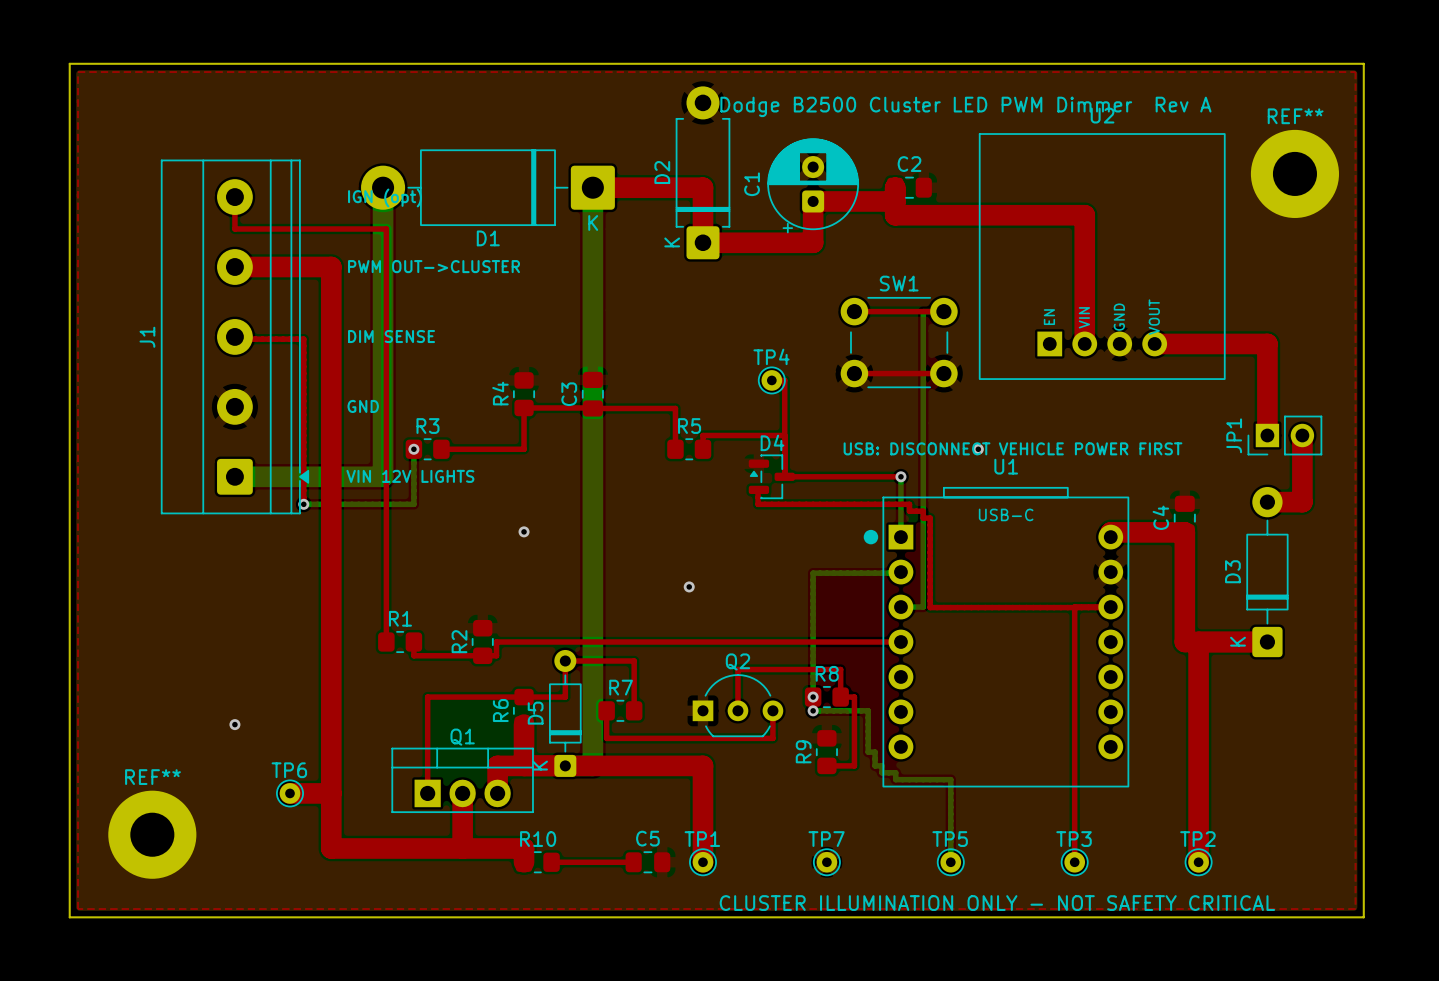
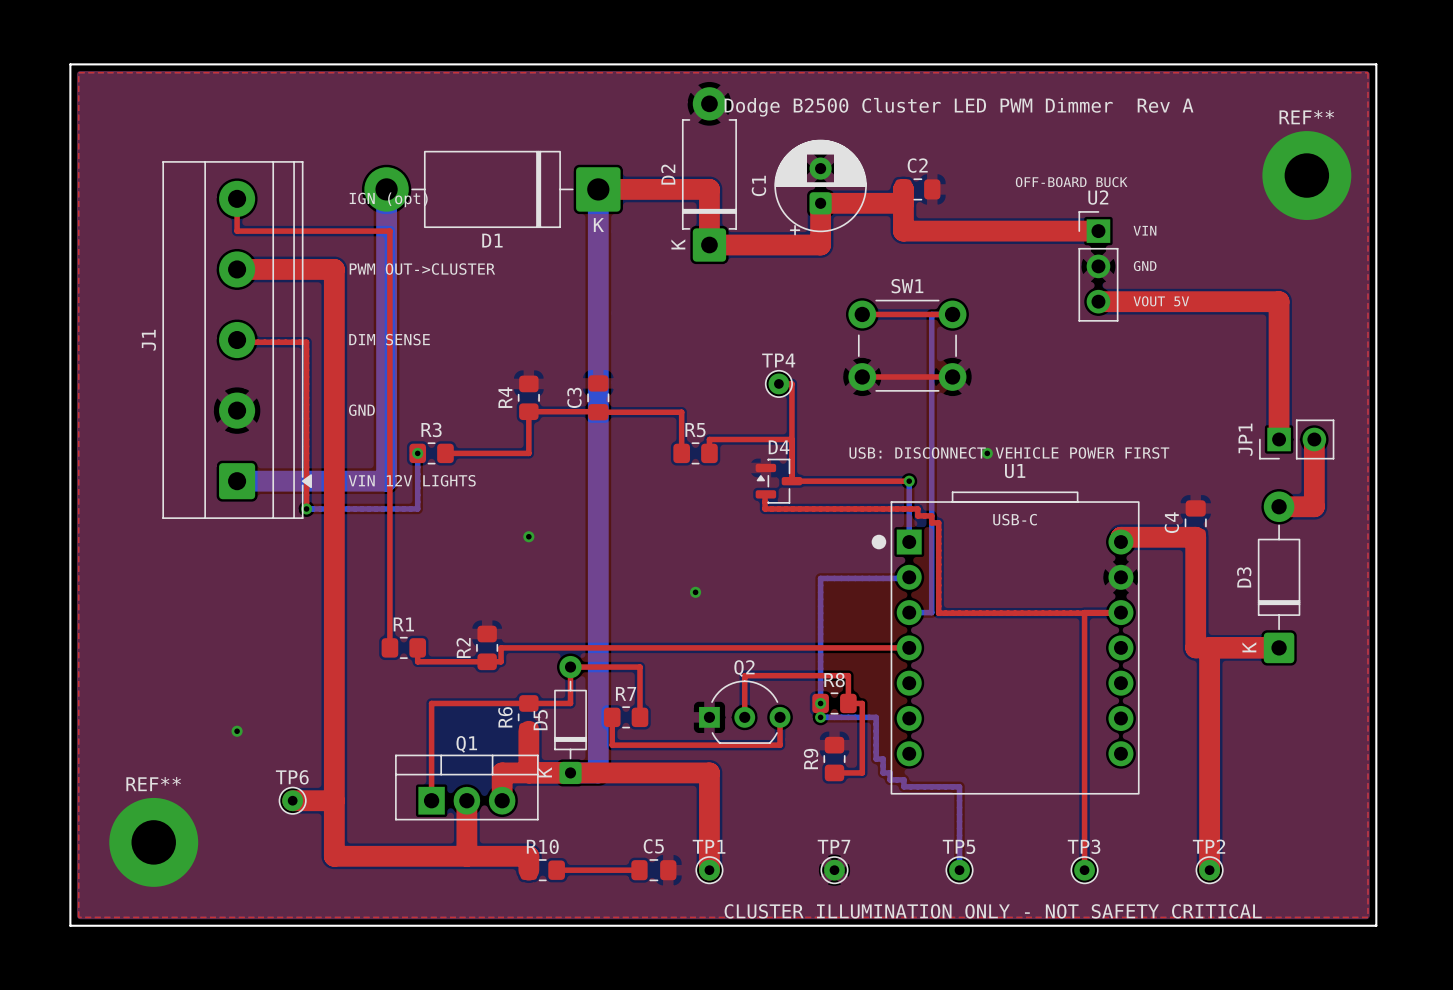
U2 name position: U2 (1102, 115) -> U2 (1098, 197)
U2 footprint: [978, 133, 1226, 380] -> [1078, 211, 1119, 322]
text: none -> OFF-BOARD BUCK (1071, 182)
top track: (895, 215) (1084, 215) (1084, 343) -> (903, 217) (903, 231) (1098, 231)
text: none -> VIN (1144, 230)
text: none -> GND (1145, 266)
text: none -> VOUT 5V (1161, 301)
top track: (1154, 343) (1267, 343) -> (1098, 301) (1279, 301) (1279, 347)

